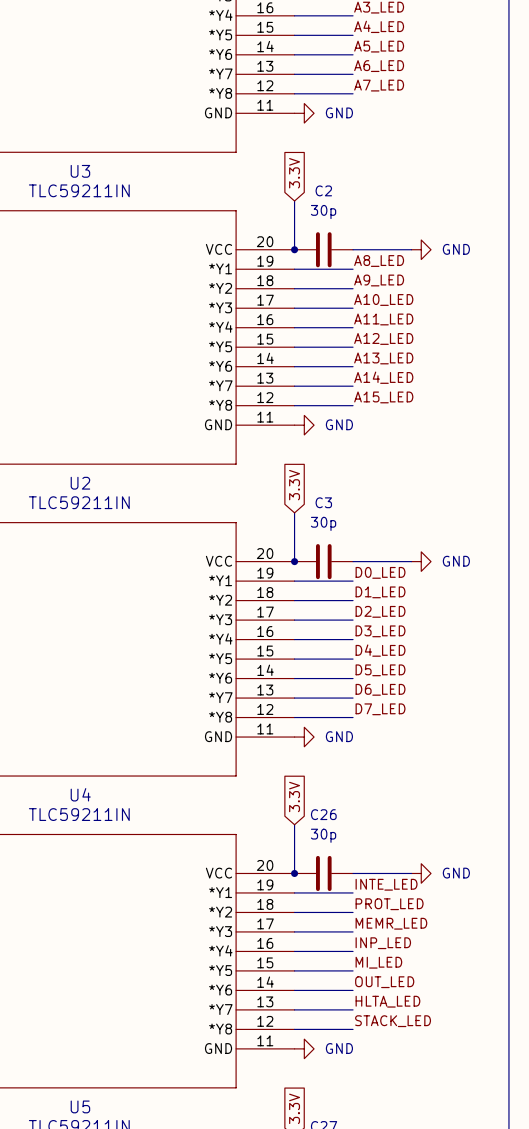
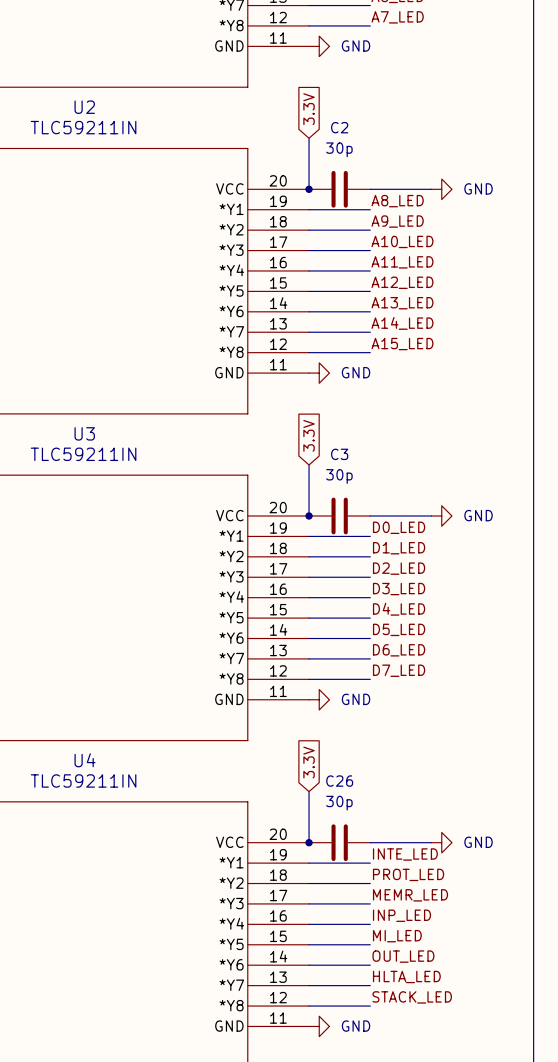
U3 name: U3 (80, 171) -> U2 (84, 107)
U2 name: U2 (80, 483) -> U3 (84, 433)

